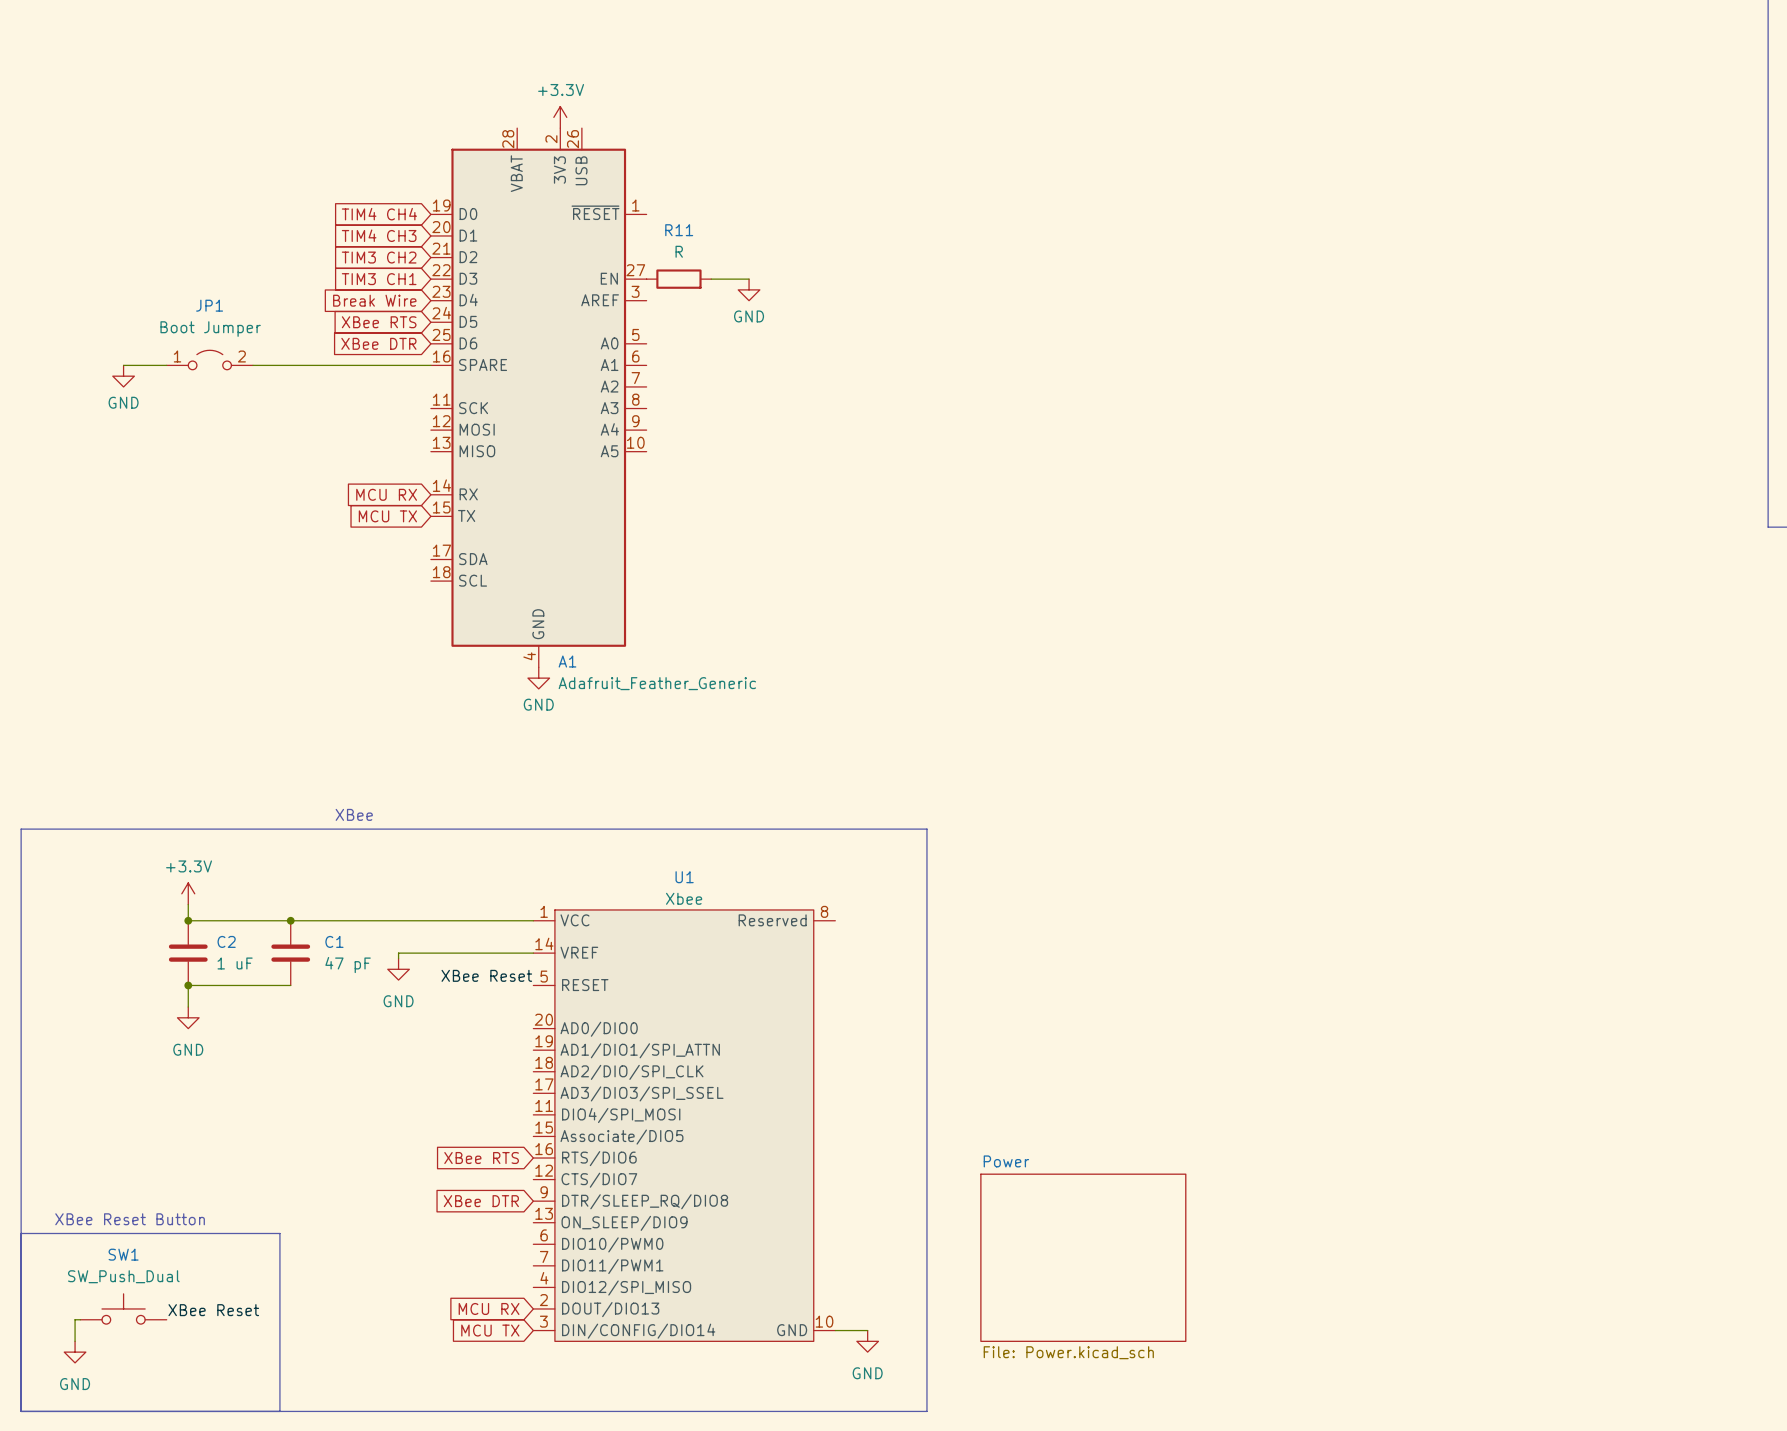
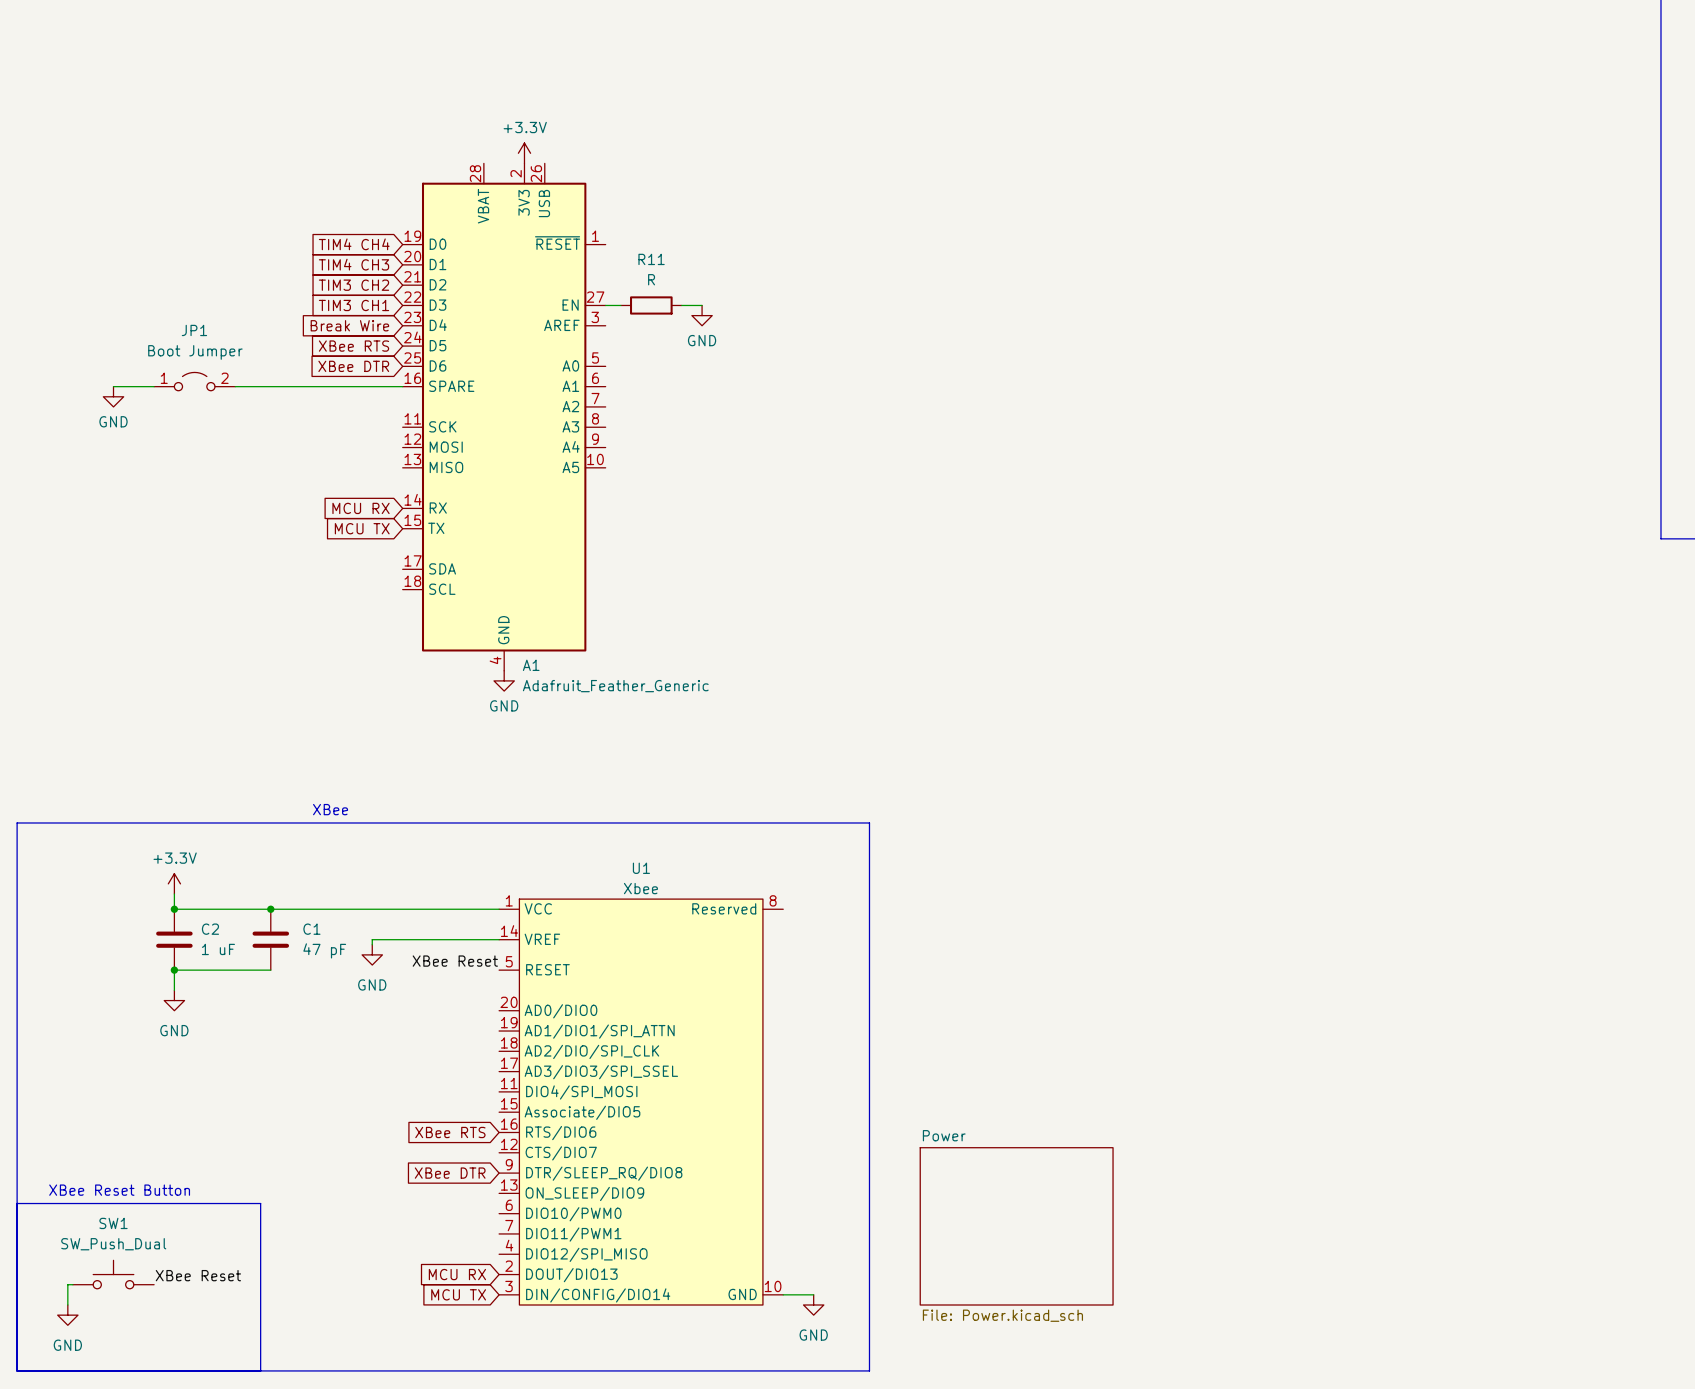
R11 position: (678, 279) -> (651, 305)

